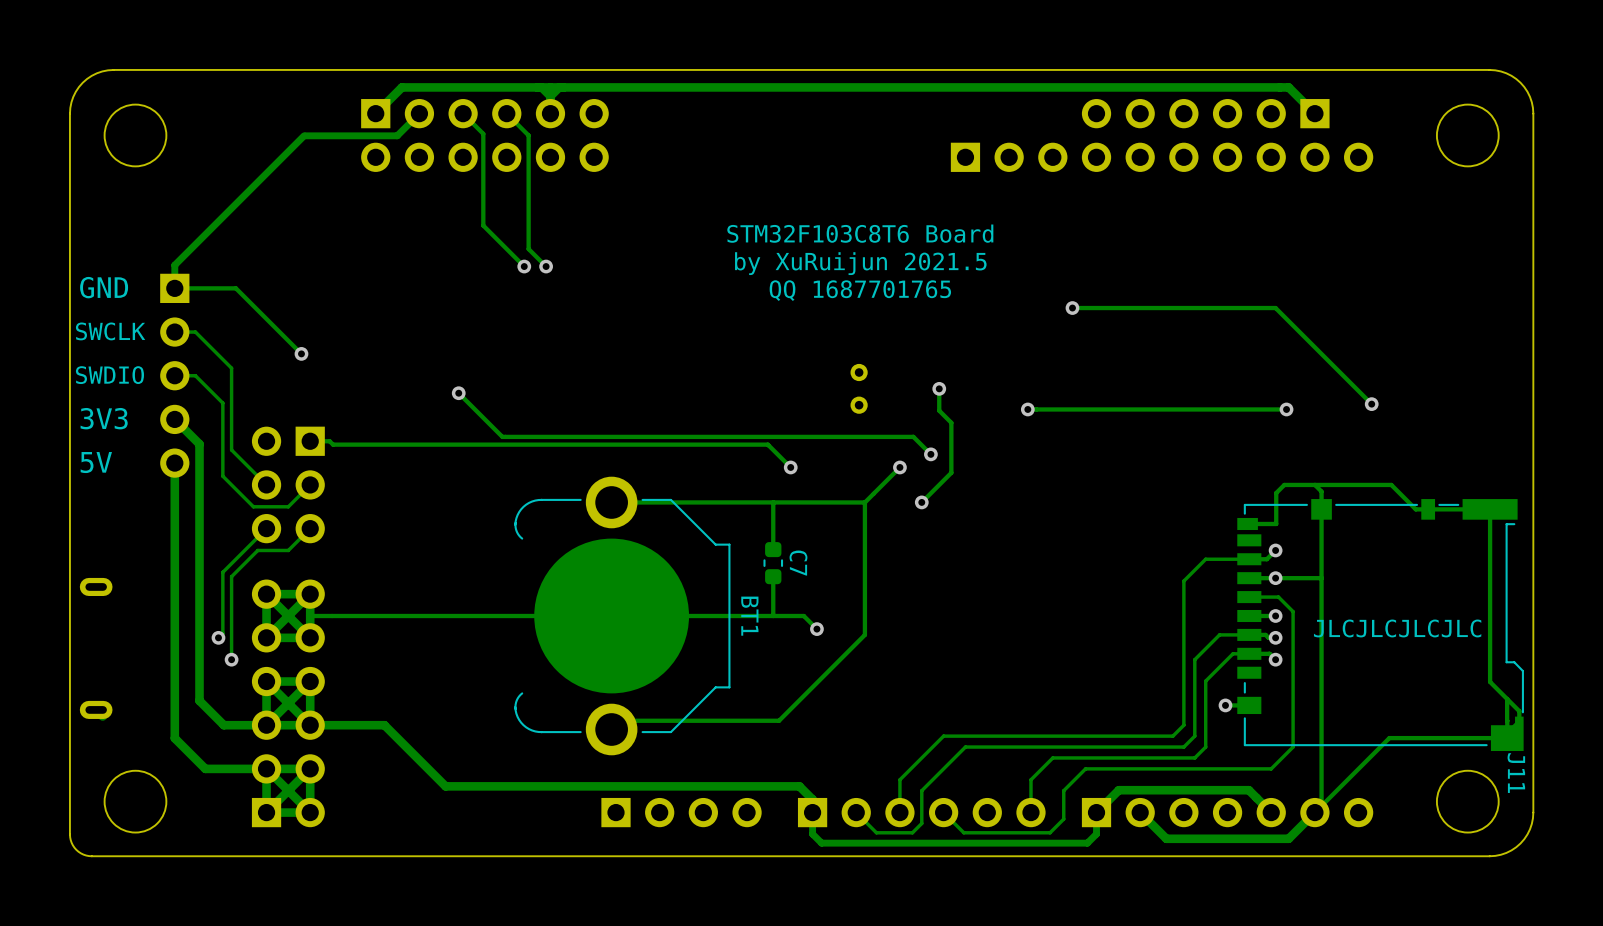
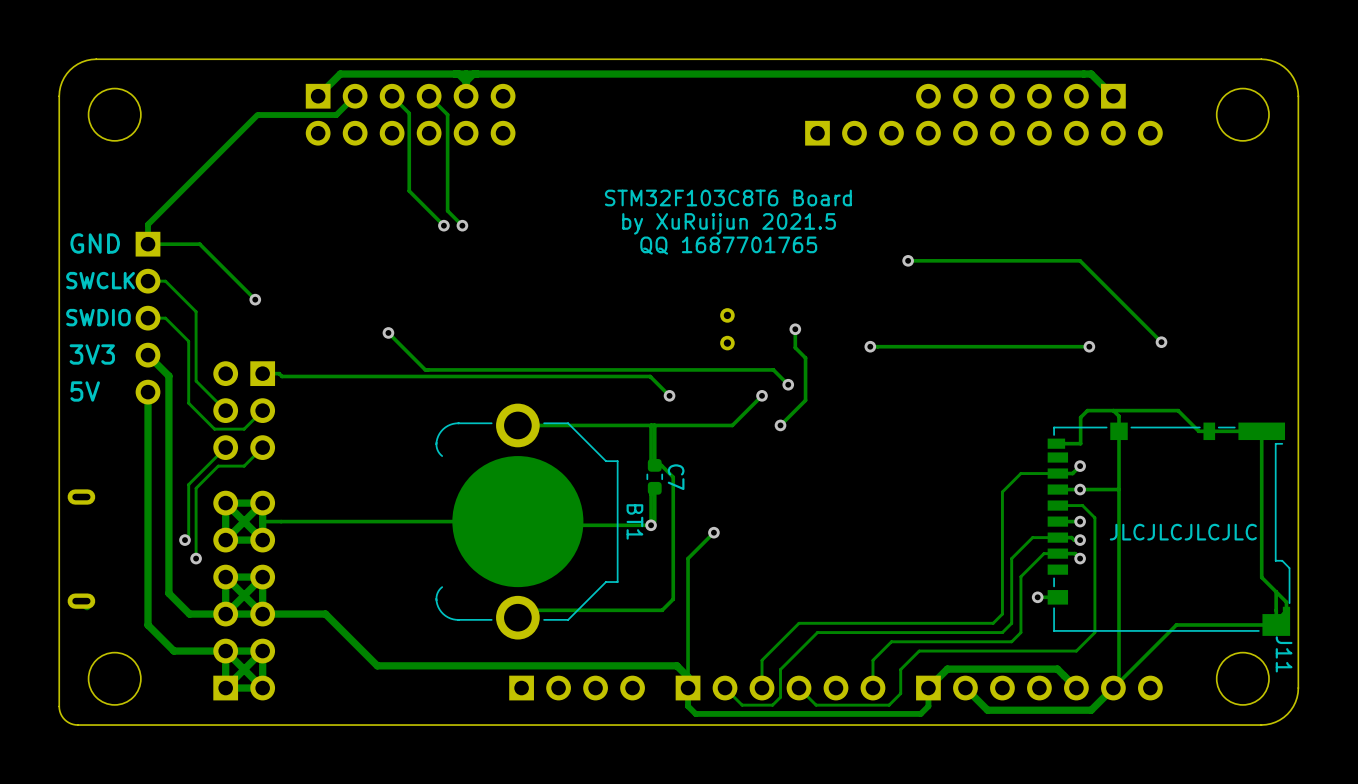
track: (864, 502) (864, 634) (779, 720) -> (654, 425) (651, 425) (651, 465) (661, 465) (673, 477) (673, 599) (662, 610) (659, 610)
track: (611, 616) (803, 616) (816, 629) -> (517, 521) (521, 525) (651, 525) (651, 488)
via: none -> (651, 525)
via: (816, 629) -> none
track: none -> (713, 532) (688, 558) (688, 688)
via: none -> (713, 532)

